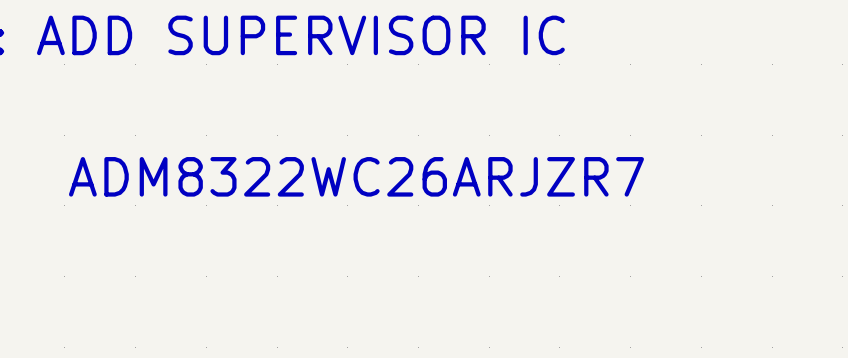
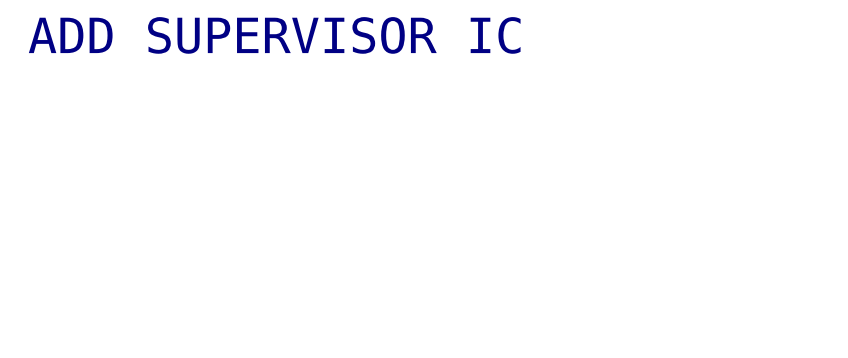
text: ADM8322WC26ARJZR7 (356, 176) -> none

